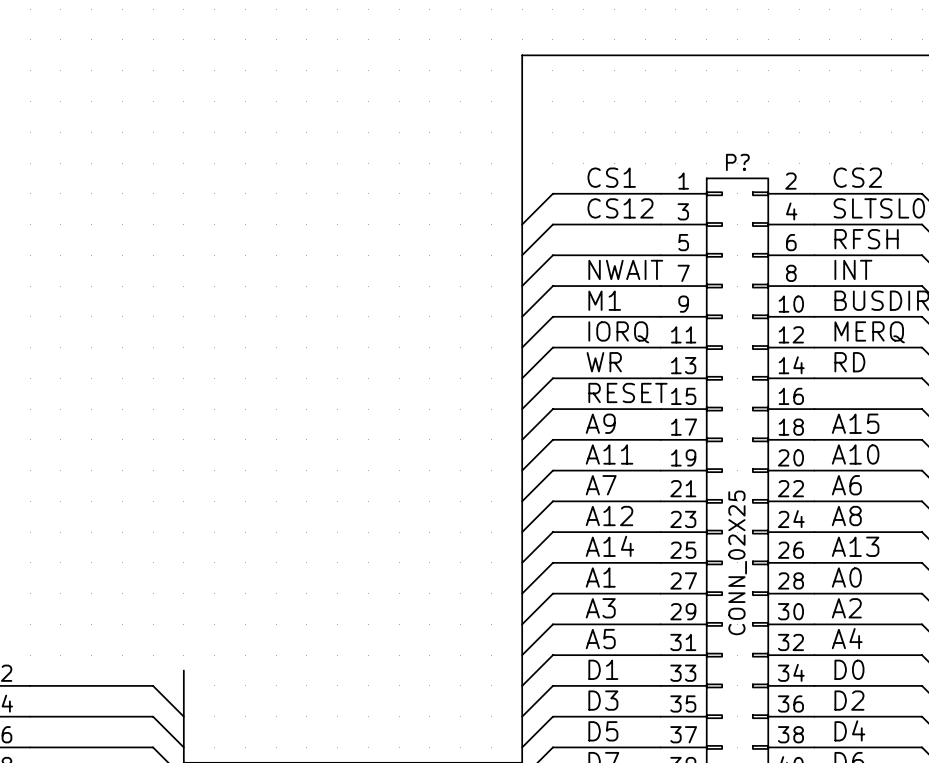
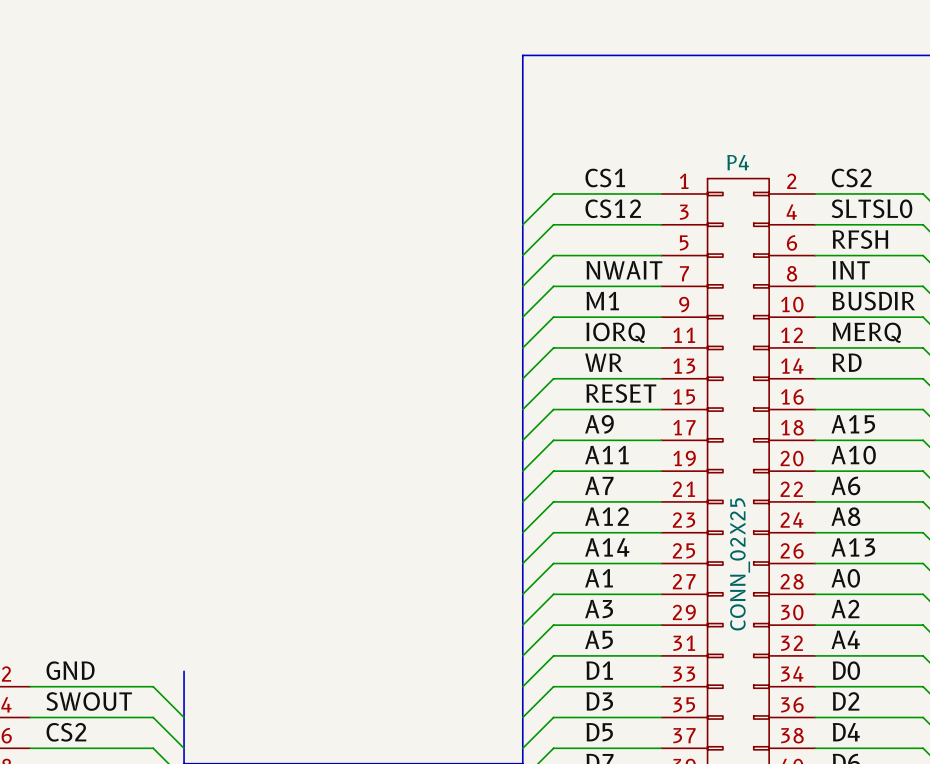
P? name: P? (737, 162) -> P4 (738, 162)
label: none -> GND (70, 670)
label: none -> SWOUT (89, 701)
label: none -> CS2 (66, 732)

